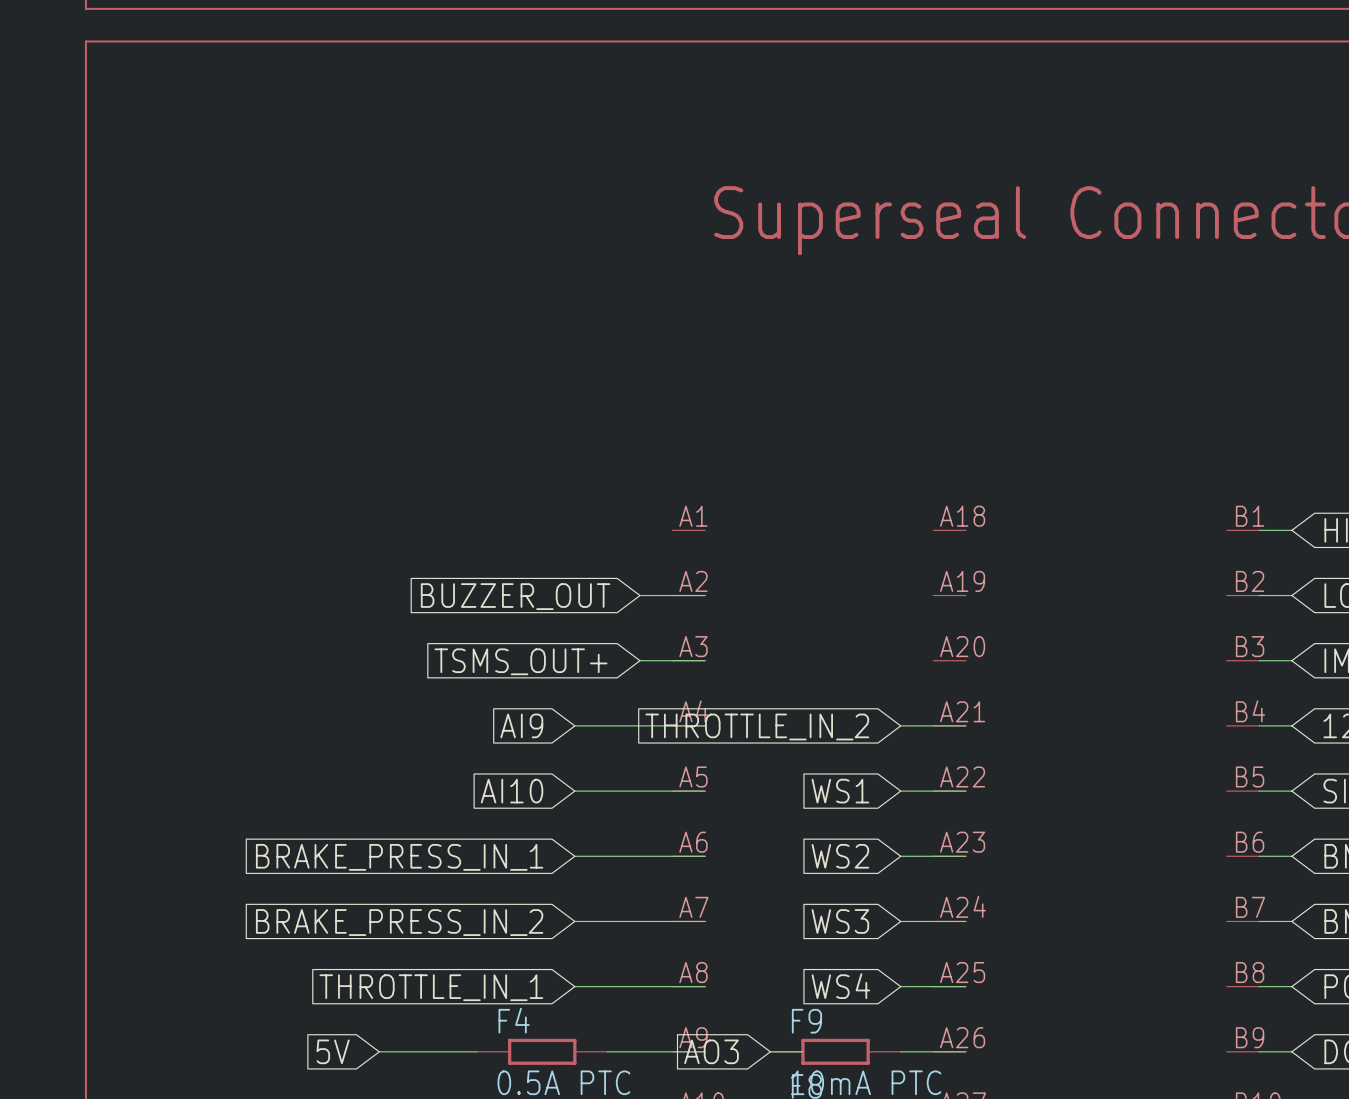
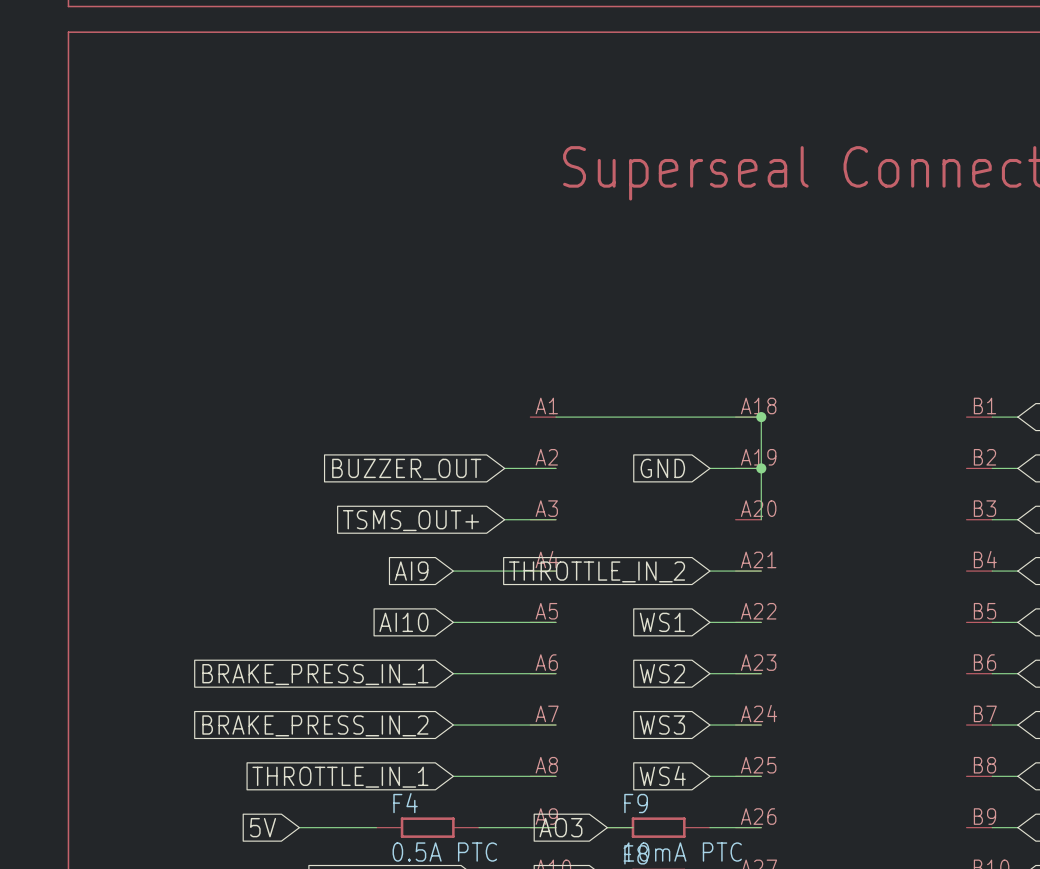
wire: none -> (556, 417) (761, 417) (761, 519)
junction: none -> (761, 417)
global label: none -> GND (662, 468)
wire: none -> (709, 468) (761, 468)
junction: none -> (761, 468)

